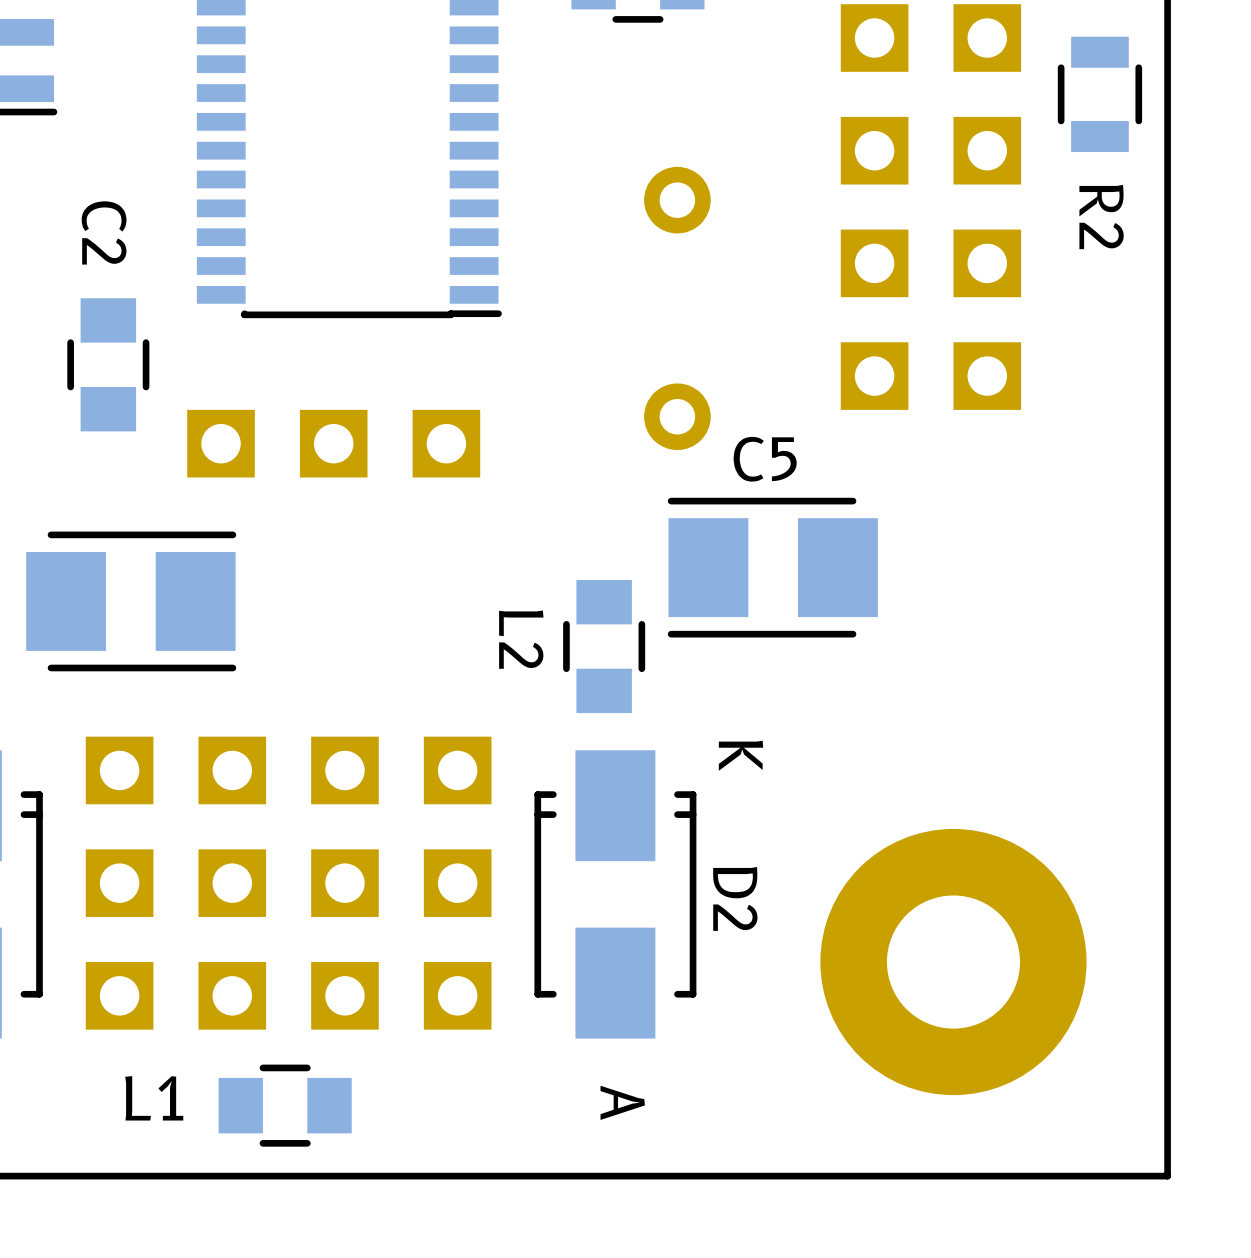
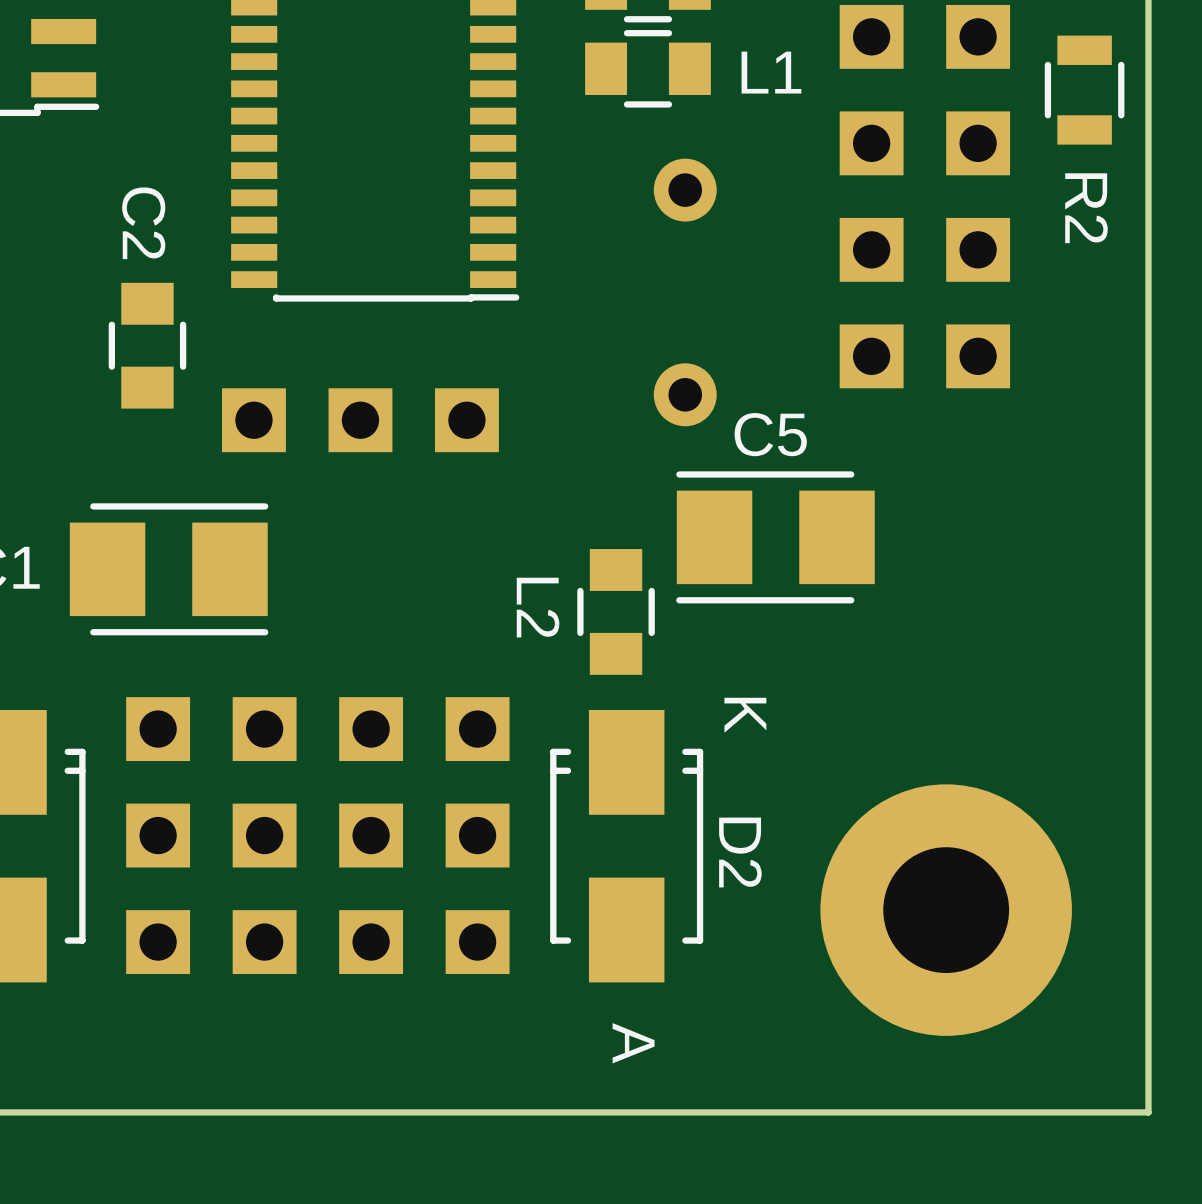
L1 name position: L1 (154, 1098) -> L1 (771, 72)
L1 position: (285, 1105) -> (647, 68)

